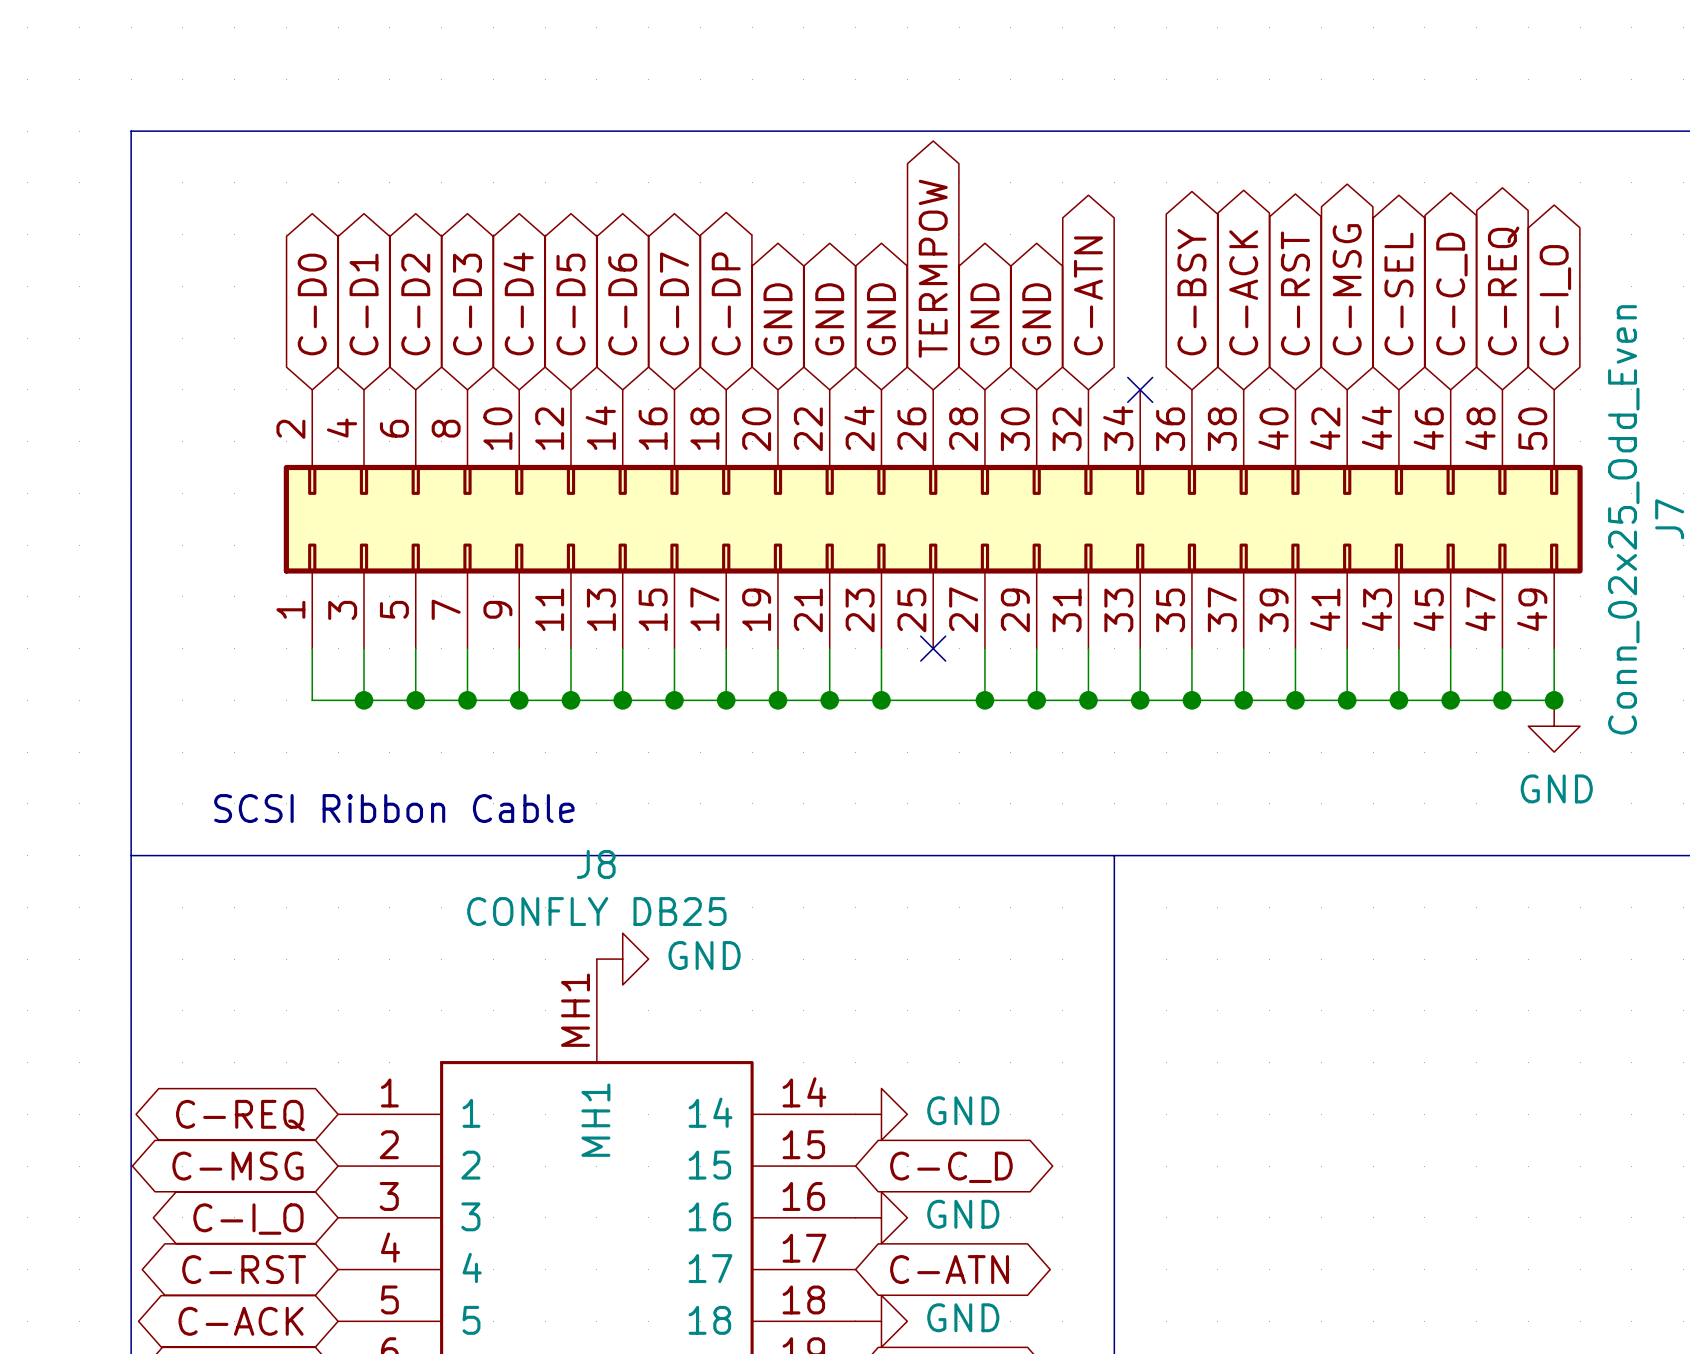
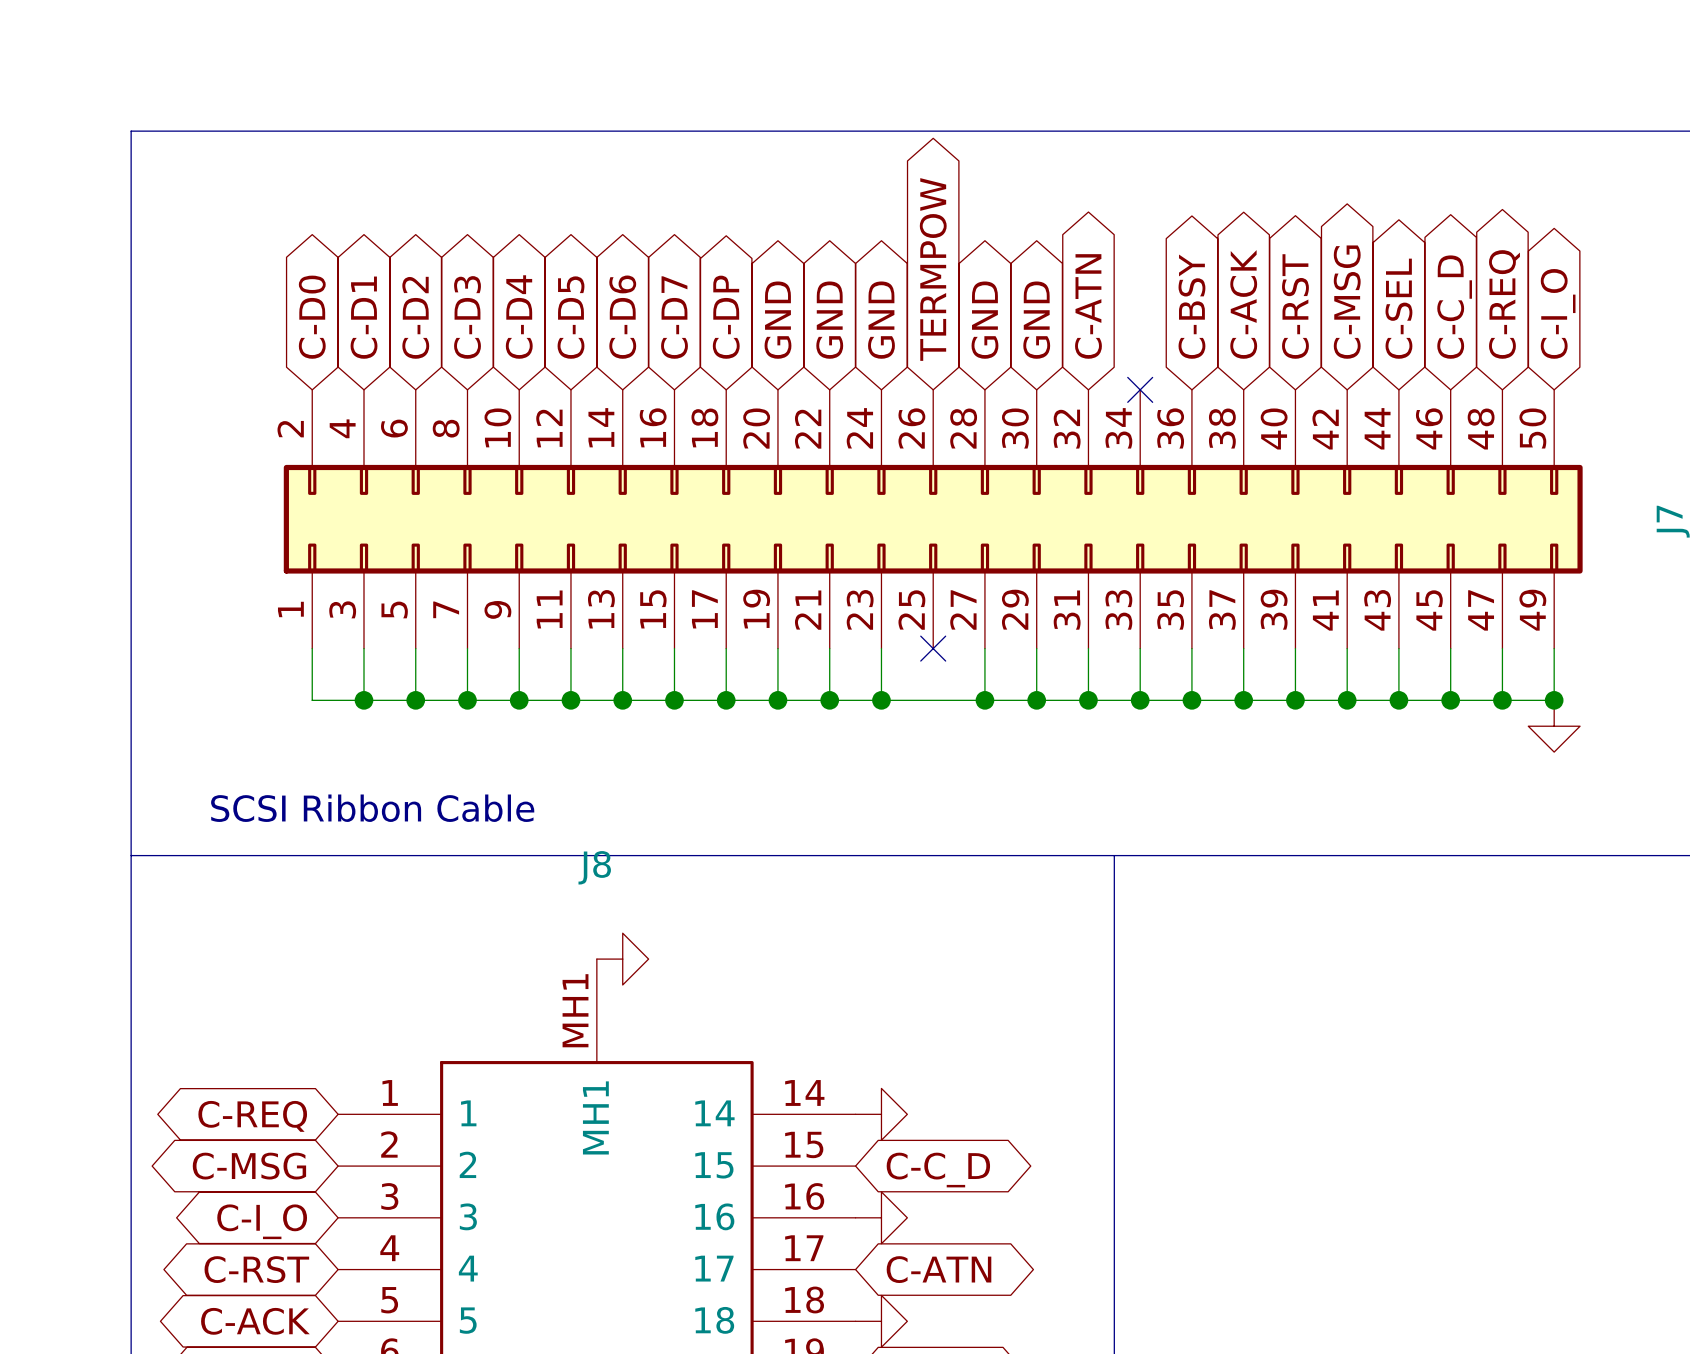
J7 value: Conn_02x25_Odd_Even (1623, 519) -> none
power symbol text: GND (1556, 788) -> none
J8 value: CONFLY DB25 (596, 911) -> none
power symbol text: GND (704, 955) -> none
power symbol text: GND (963, 1110) -> none
power symbol text: GND (963, 1214) -> none
power symbol text: GND (963, 1317) -> none

